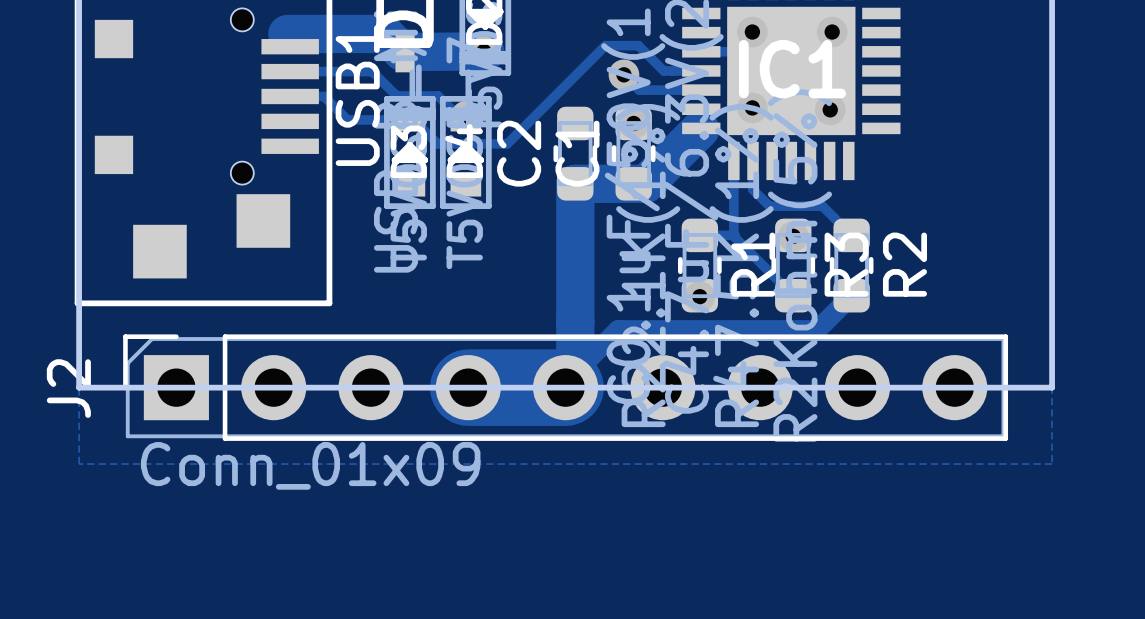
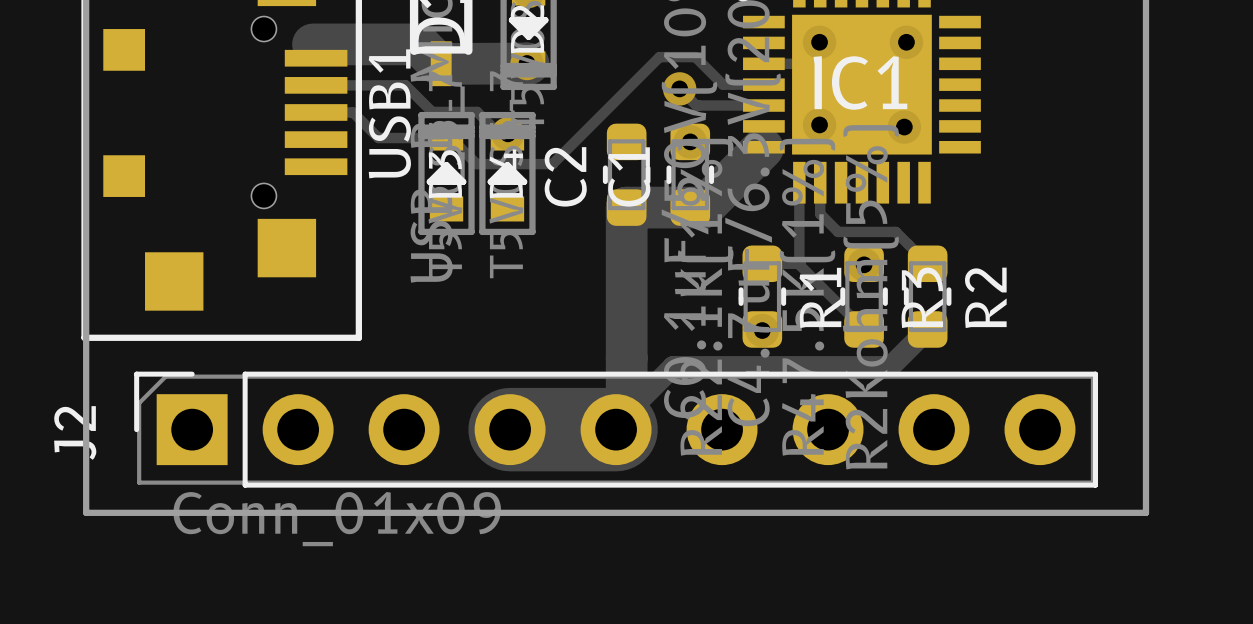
board edge: (79, 387) (1052, 387) -> (86, 429) (86, 512) (1145, 512) (1145, 429)

